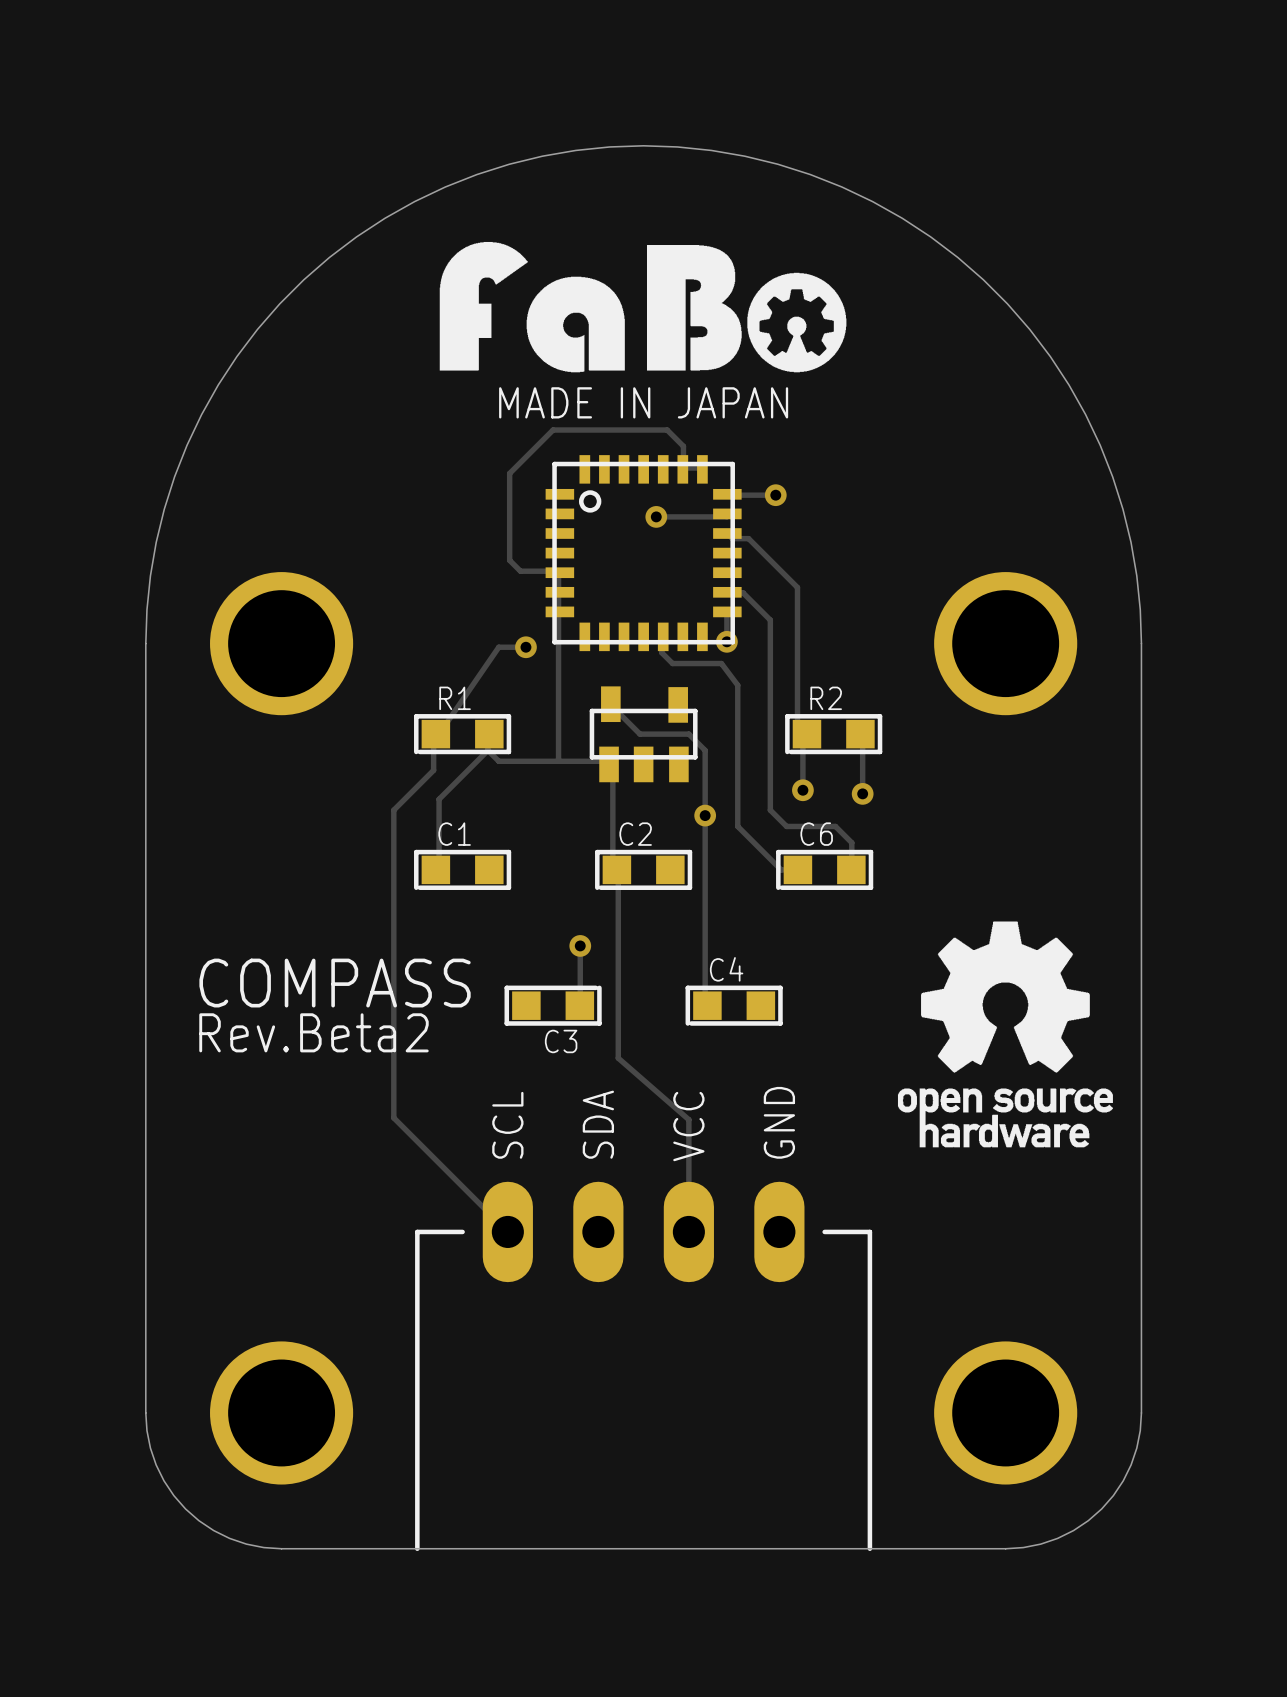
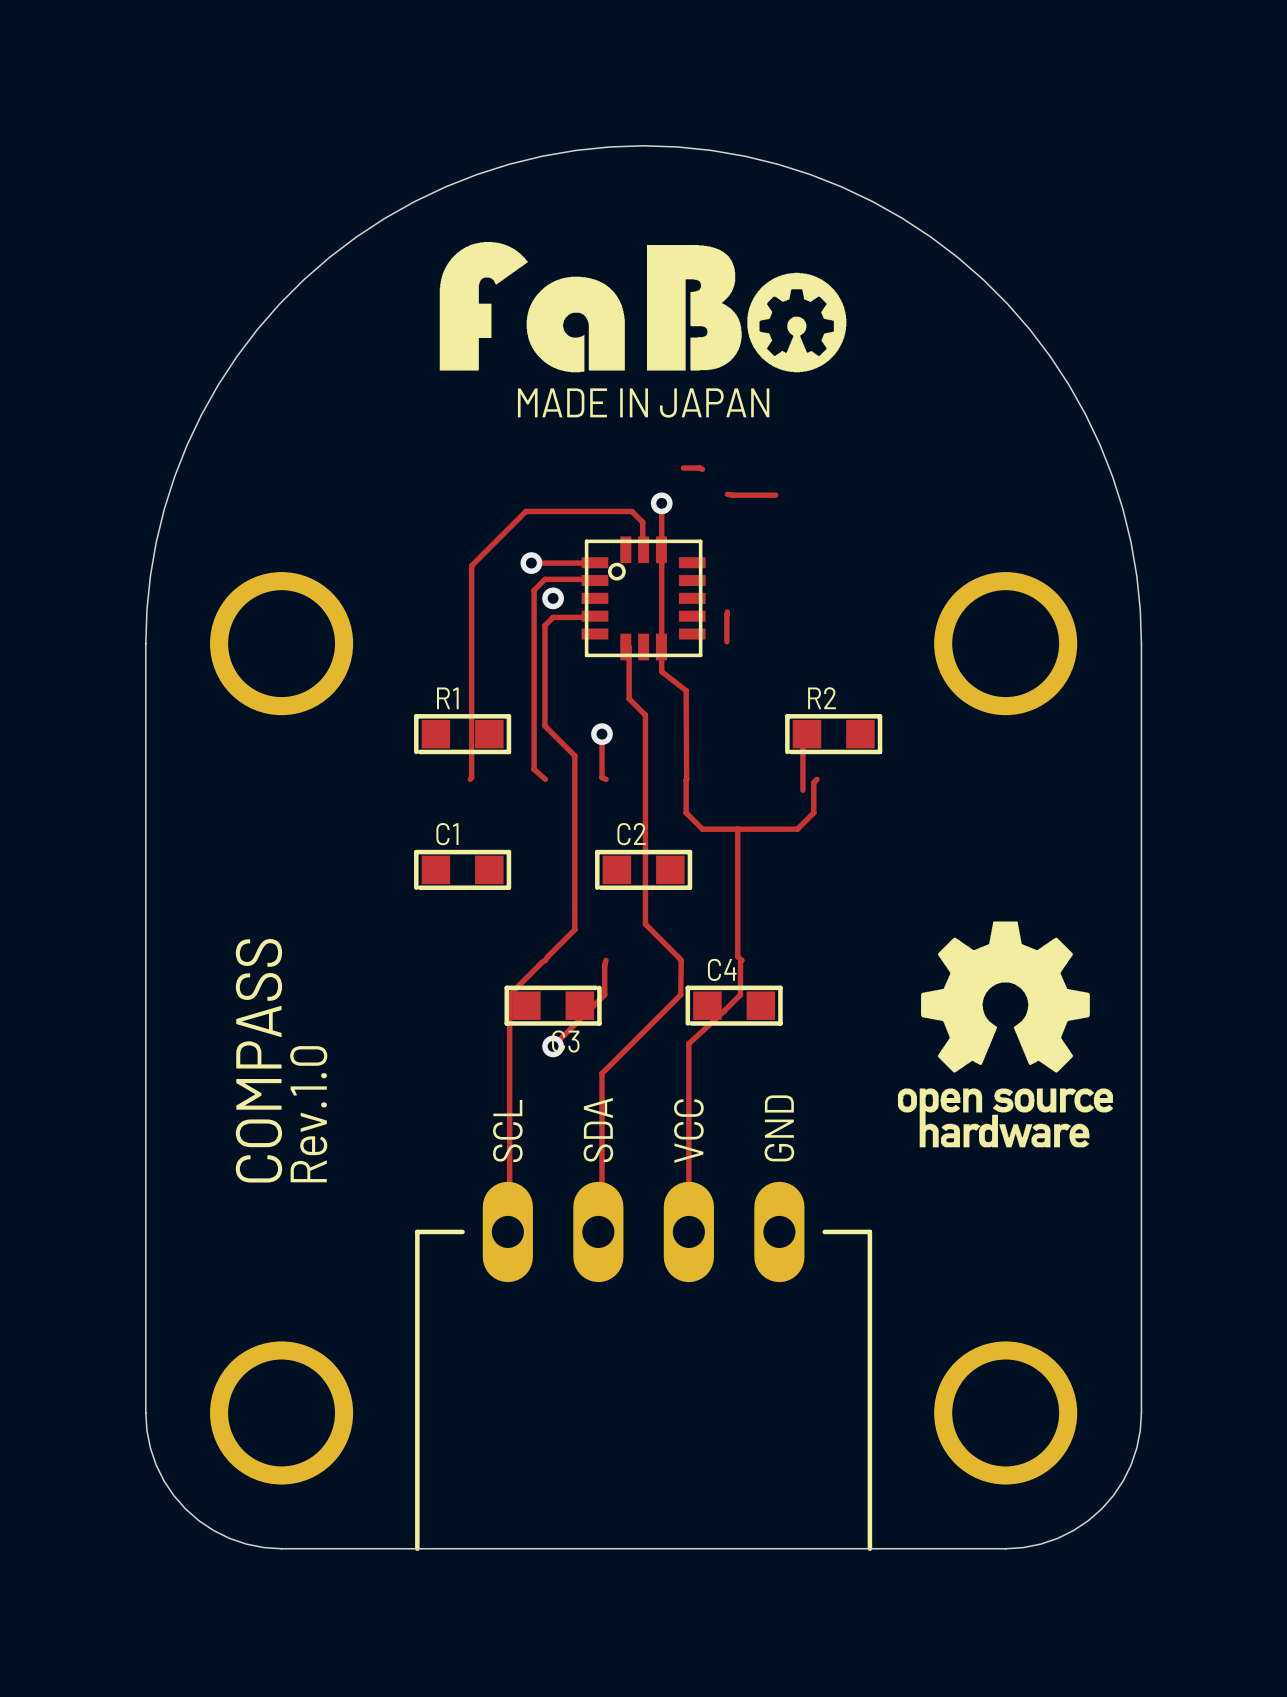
track: (682, 469) (683, 446) (667, 430) (553, 430) (509, 473) (509, 560) (520, 571) (559, 572) (558, 761) -> none
via: (775, 495) -> none
track: none -> (661, 503) (661, 549)
track: (727, 513) (726, 516) (656, 516) -> none
via position: (656, 516) -> (661, 503)
track: (727, 533) (732, 538) (748, 538) (797, 587) (797, 734) (806, 734) -> none
track: none -> (643, 549) (642, 522) (631, 511) (525, 511) (471, 565) (470, 779)
track: none -> (661, 549) (661, 671) (686, 690) (686, 812) (702, 829) (797, 829) (813, 812) (813, 783) (816, 779)
part: (643, 553) -> none
track: none -> (594, 562) (531, 563)
via: none -> (531, 563)
track: none -> (594, 580) (544, 579) (534, 590) (534, 769) (545, 779)
track: (727, 592) (743, 592) (770, 620) (770, 810) (786, 826) (835, 826) (851, 842) (851, 869) -> none
via: none -> (553, 598)
part: none -> (643, 598)
track: (663, 636) (661, 652) (672, 663) (721, 663) (737, 685) (737, 826) (781, 869) (797, 869) -> none
via: (726, 641) -> none
track: (525, 647) (498, 647) (439, 734) (433, 734) (433, 770) (393, 810) (393, 1117) (507, 1231) -> (594, 616) (553, 617) (544, 625) (544, 725) (574, 755) (574, 929) (509, 994) (509, 1228) (507, 1231)
via: (525, 647) -> none
track: none -> (625, 647) (629, 647) (629, 698) (645, 715) (645, 924) (681, 960) (680, 994) (601, 1073) (601, 1228) (598, 1231)
track: (610, 704) (640, 734) (688, 734) (705, 750) (705, 1005) (707, 1005) -> none
track: none -> (601, 734) (601, 777) (606, 779)
via: none -> (601, 734)
part: (643, 734) -> none
track: (860, 734) (862, 739) (862, 793) -> none
track: (487, 750) (498, 761) (607, 761) (612, 766) (612, 869) (618, 869) (618, 1058) (688, 1119) -> (737, 829) (737, 956) (741, 960) (740, 994) (688, 1043) (688, 1119)
track: (487, 750) (439, 799) (439, 869) (435, 869) -> none
via: (802, 790) -> none
via: (862, 793) -> none
via: (705, 815) -> none
C6: (824, 869) -> none
track: (580, 945) (580, 1005) -> none
via position: (580, 945) -> (553, 1046)
track: none -> (606, 960) (604, 994) (553, 1046)
text rotation: 0° (335, 983) -> 90° counterclockwise (258, 1060)
text: Rev.Beta2 (313, 1032) -> none
text: none -> Rev.1.0 (308, 1114)

